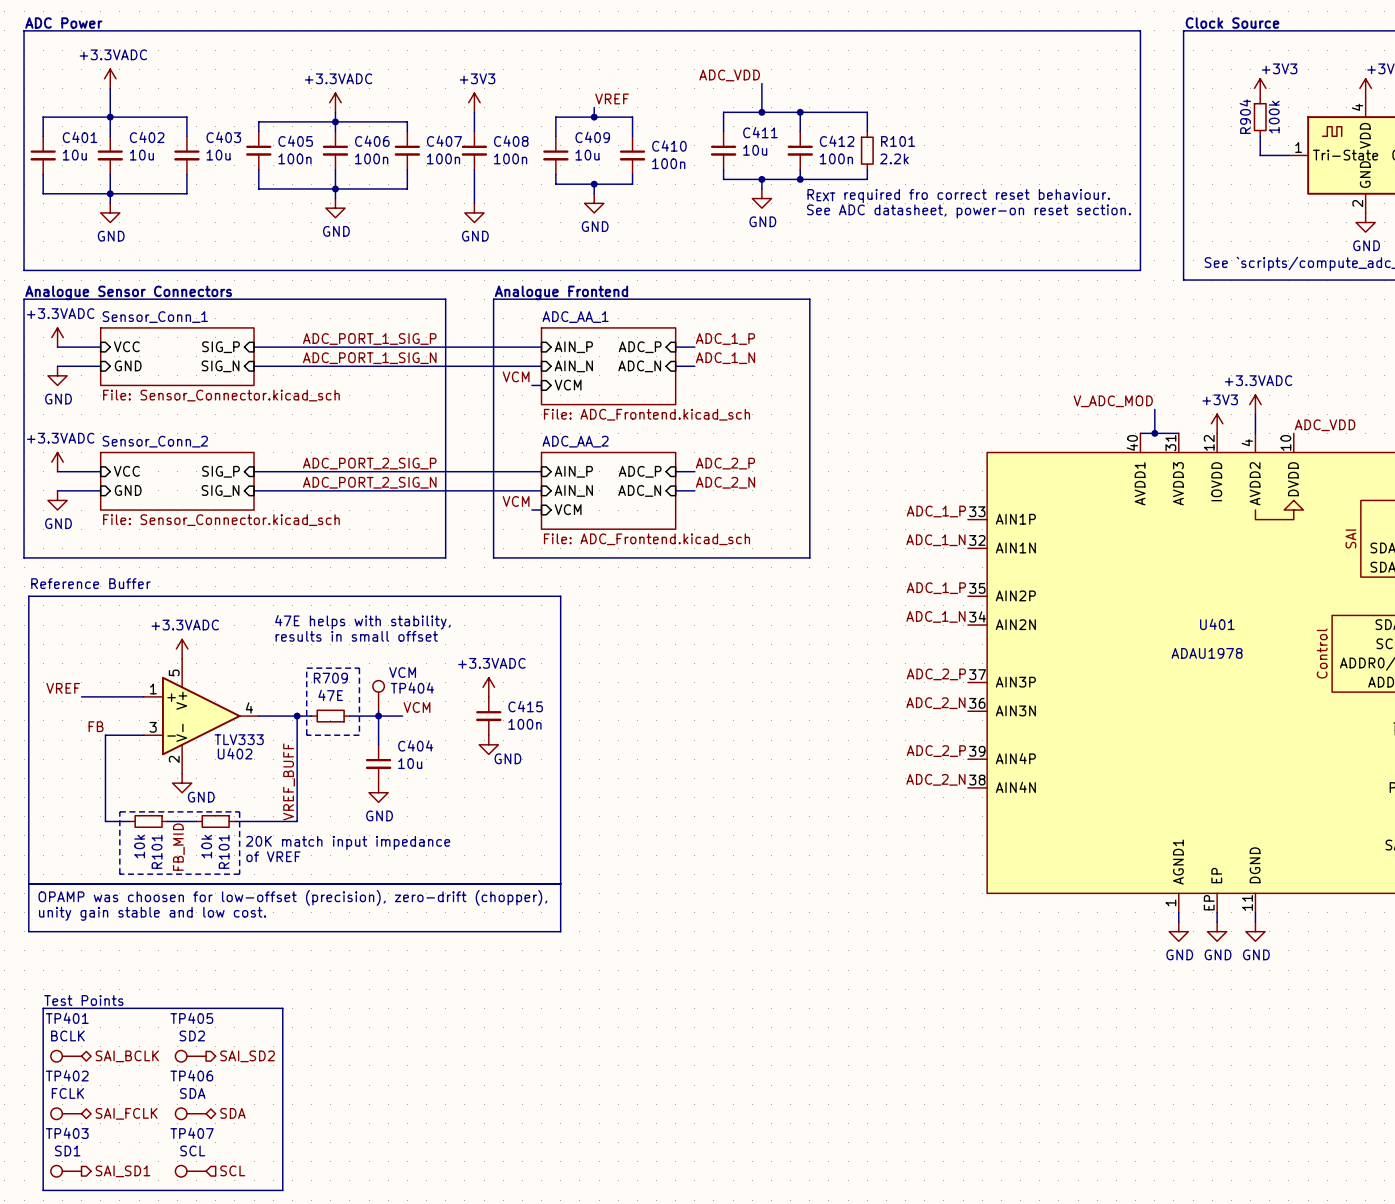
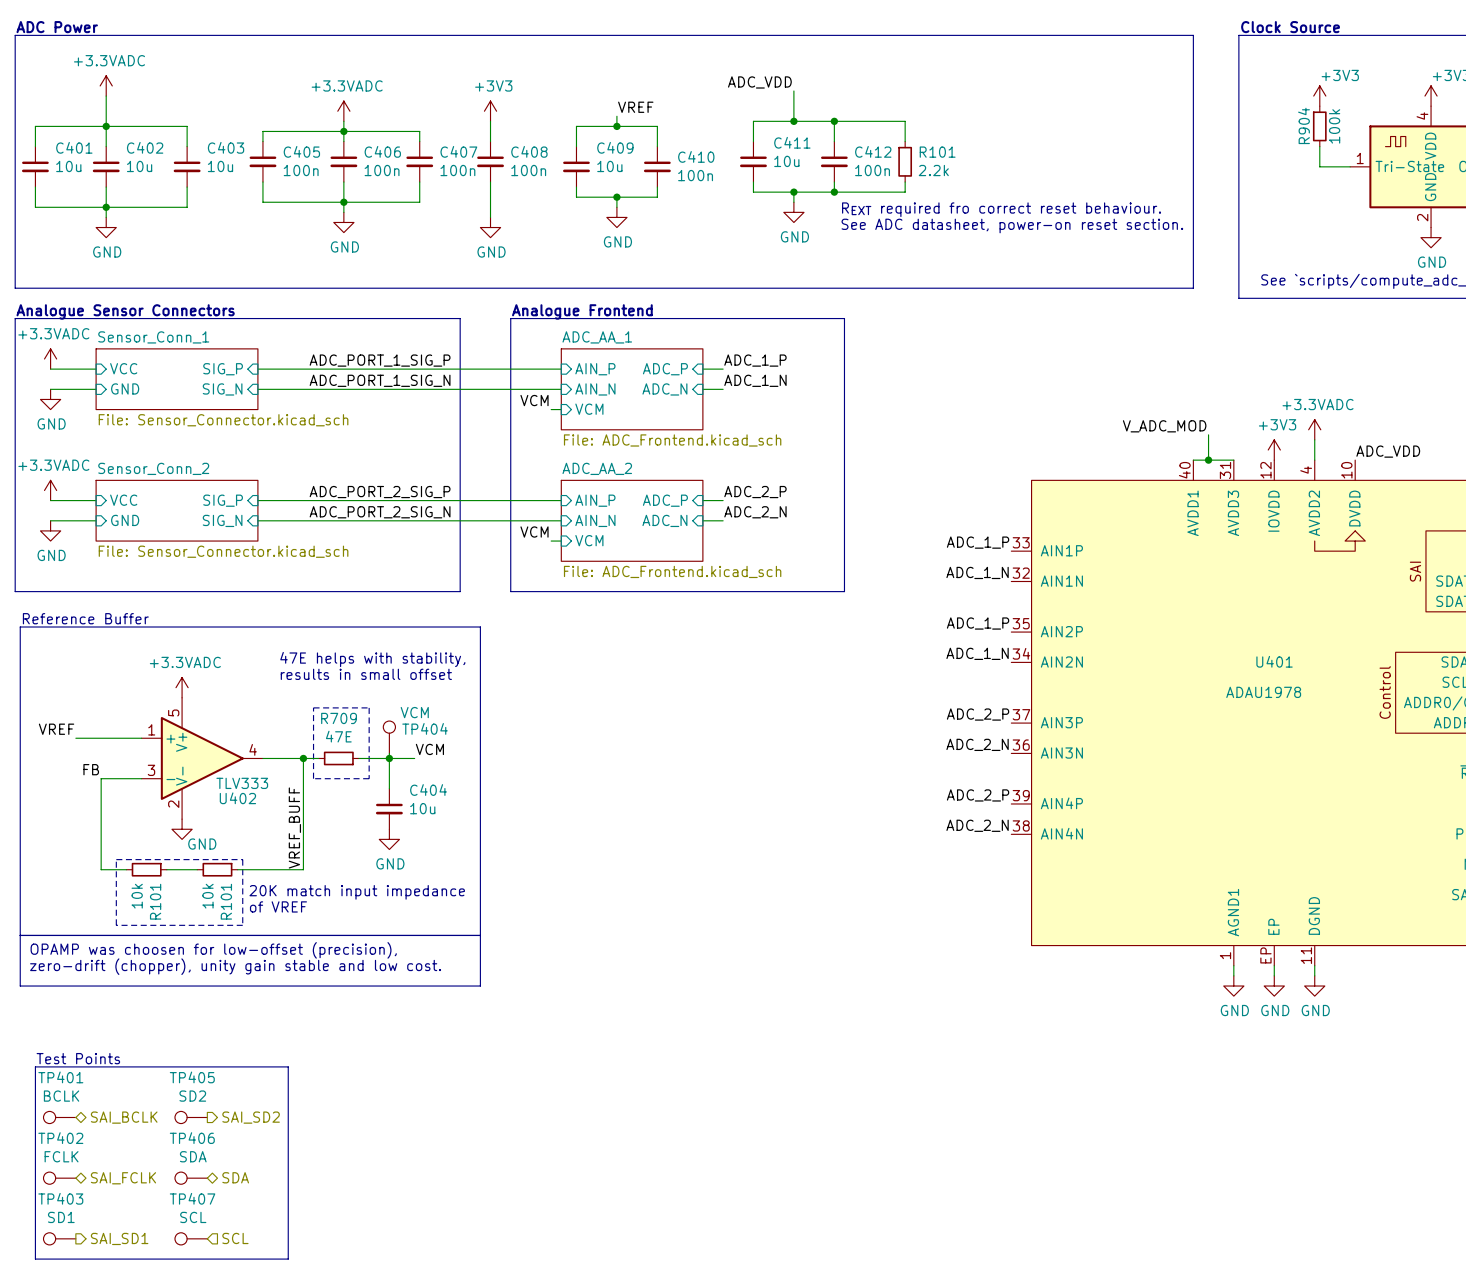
line: (28, 596) (560, 596) (560, 931) (464, 931) -> (20, 632) (20, 627) (480, 627) (480, 986)
power symbol: +3.3VADC (488, 687) -> none
C415: 100n (488, 716) -> none
power symbol: GND (488, 744) -> none
label: FB_MID (178, 847) -> none
line: (464, 883) (560, 883) -> none
text: OPAMP was choosen for low-offset (precision), zero-drift (chopper), (292, 897) -> OPAMP was choosen for low-offset (precision), (213, 950)
text: unity gain stable and low cost. (152, 913) -> zero-drift (chopper), unity gain stable and low cost. (235, 966)

